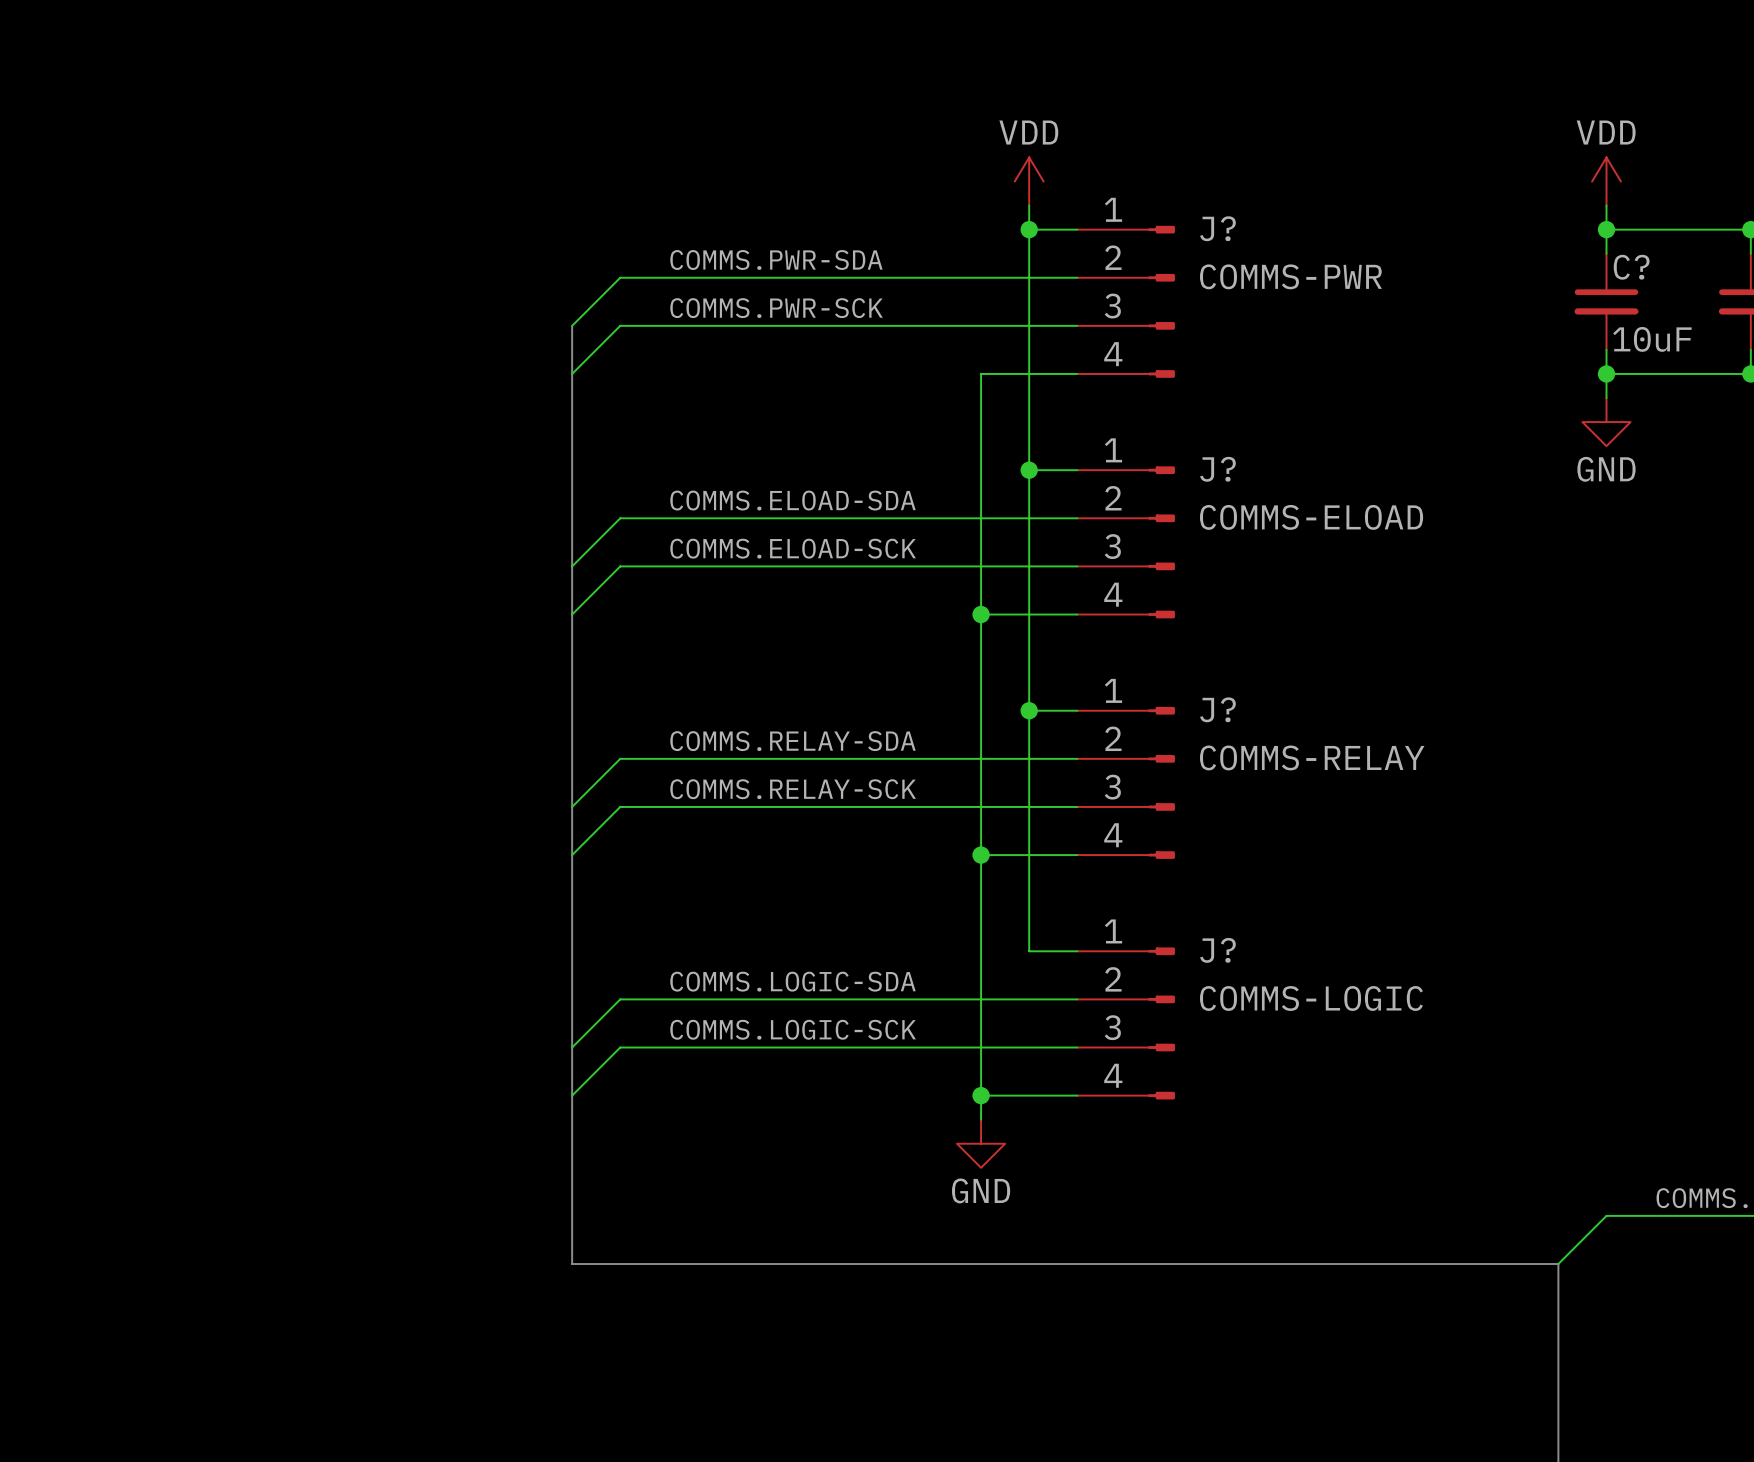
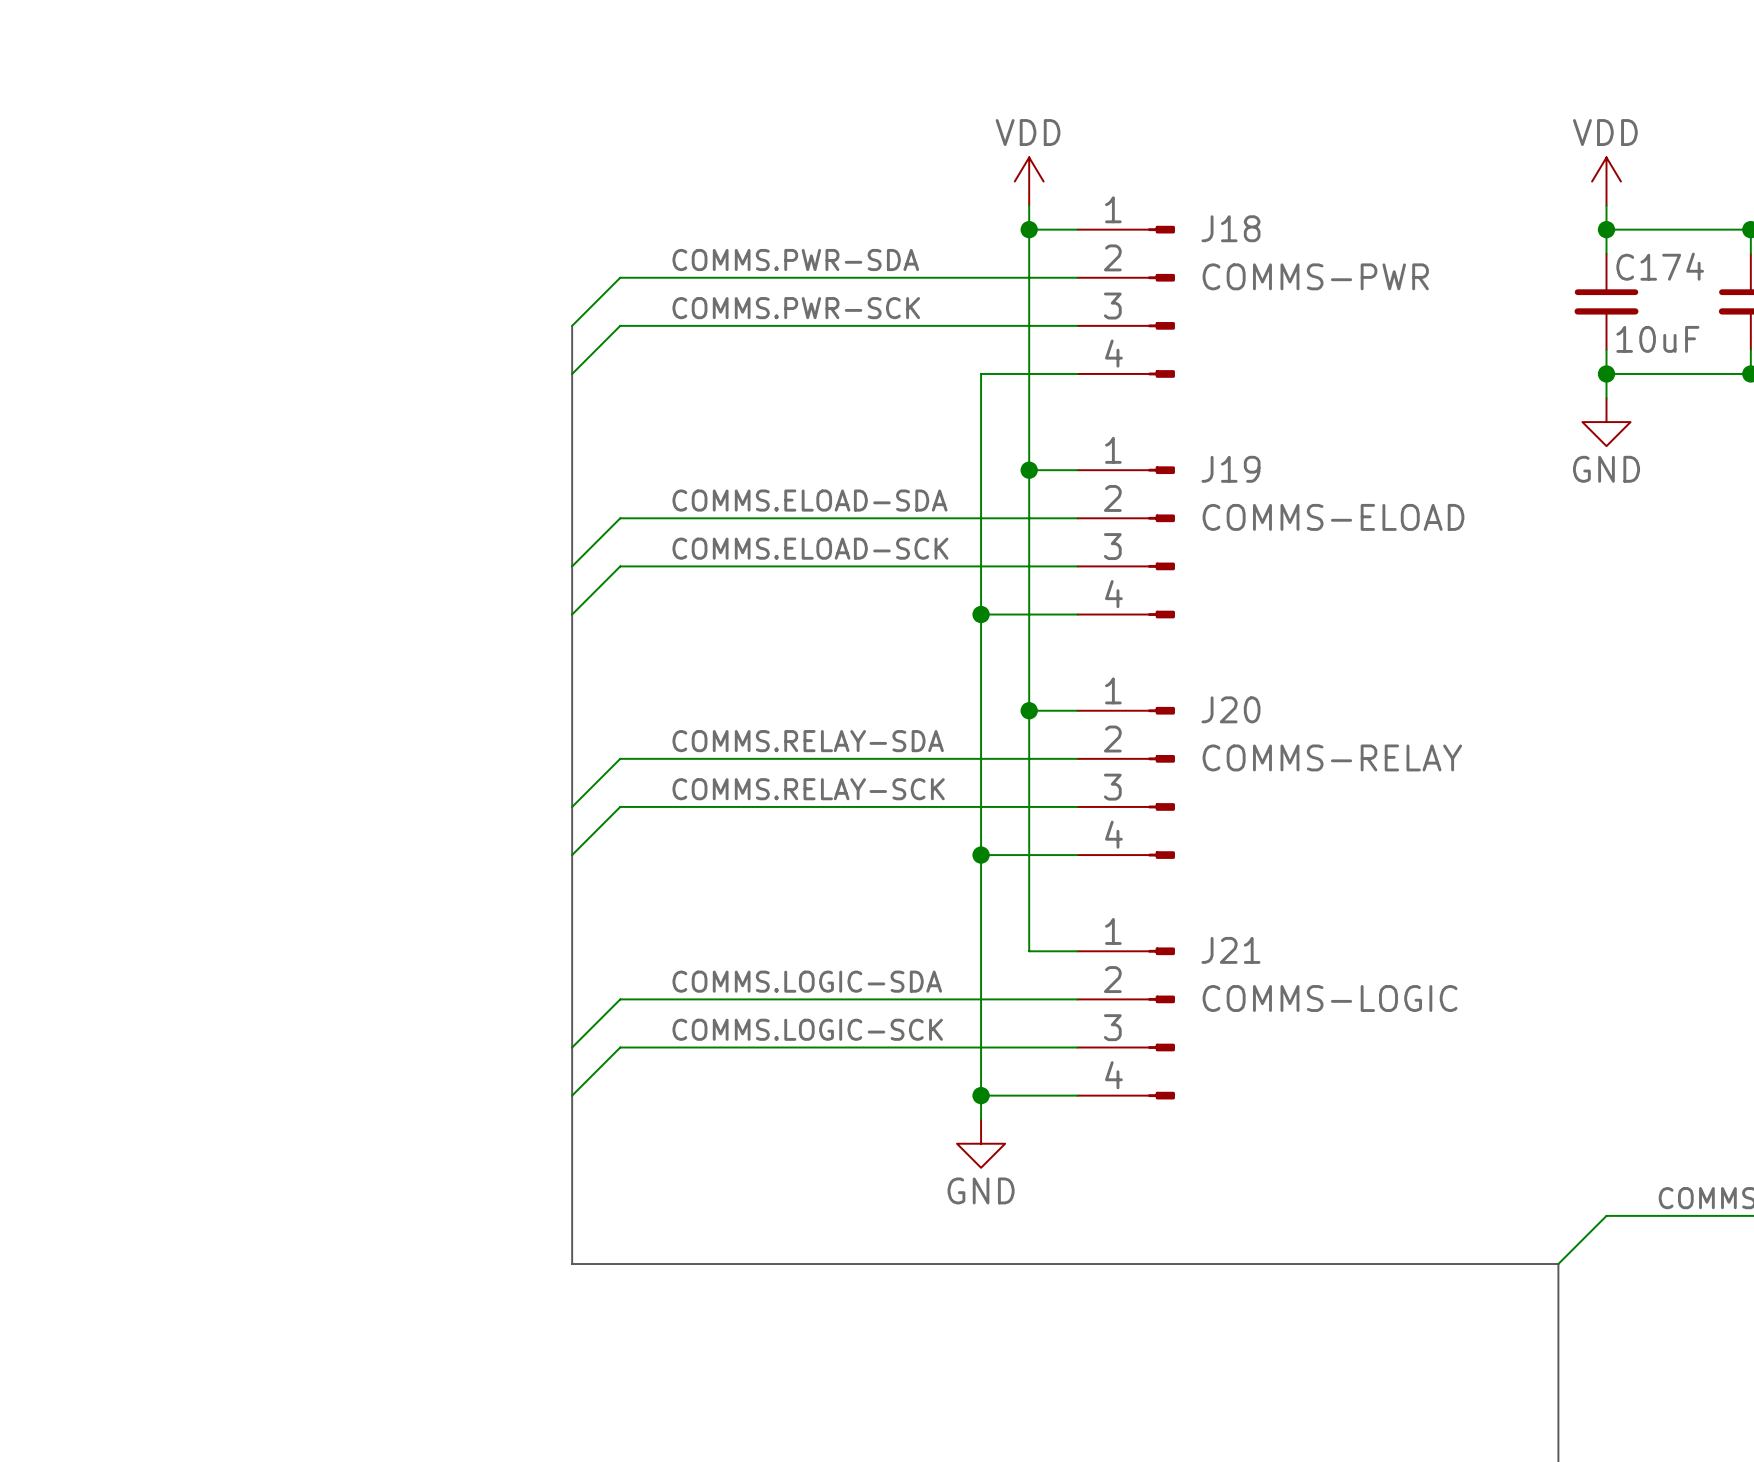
J? name: J? (1217, 228) -> J18 (1230, 228)
C? name: C? (1631, 267) -> C174 (1660, 266)
J? name: J? (1217, 469) -> J19 (1230, 469)
J? name: J? (1217, 709) -> J20 (1230, 709)
J? name: J? (1217, 950) -> J21 (1230, 950)

